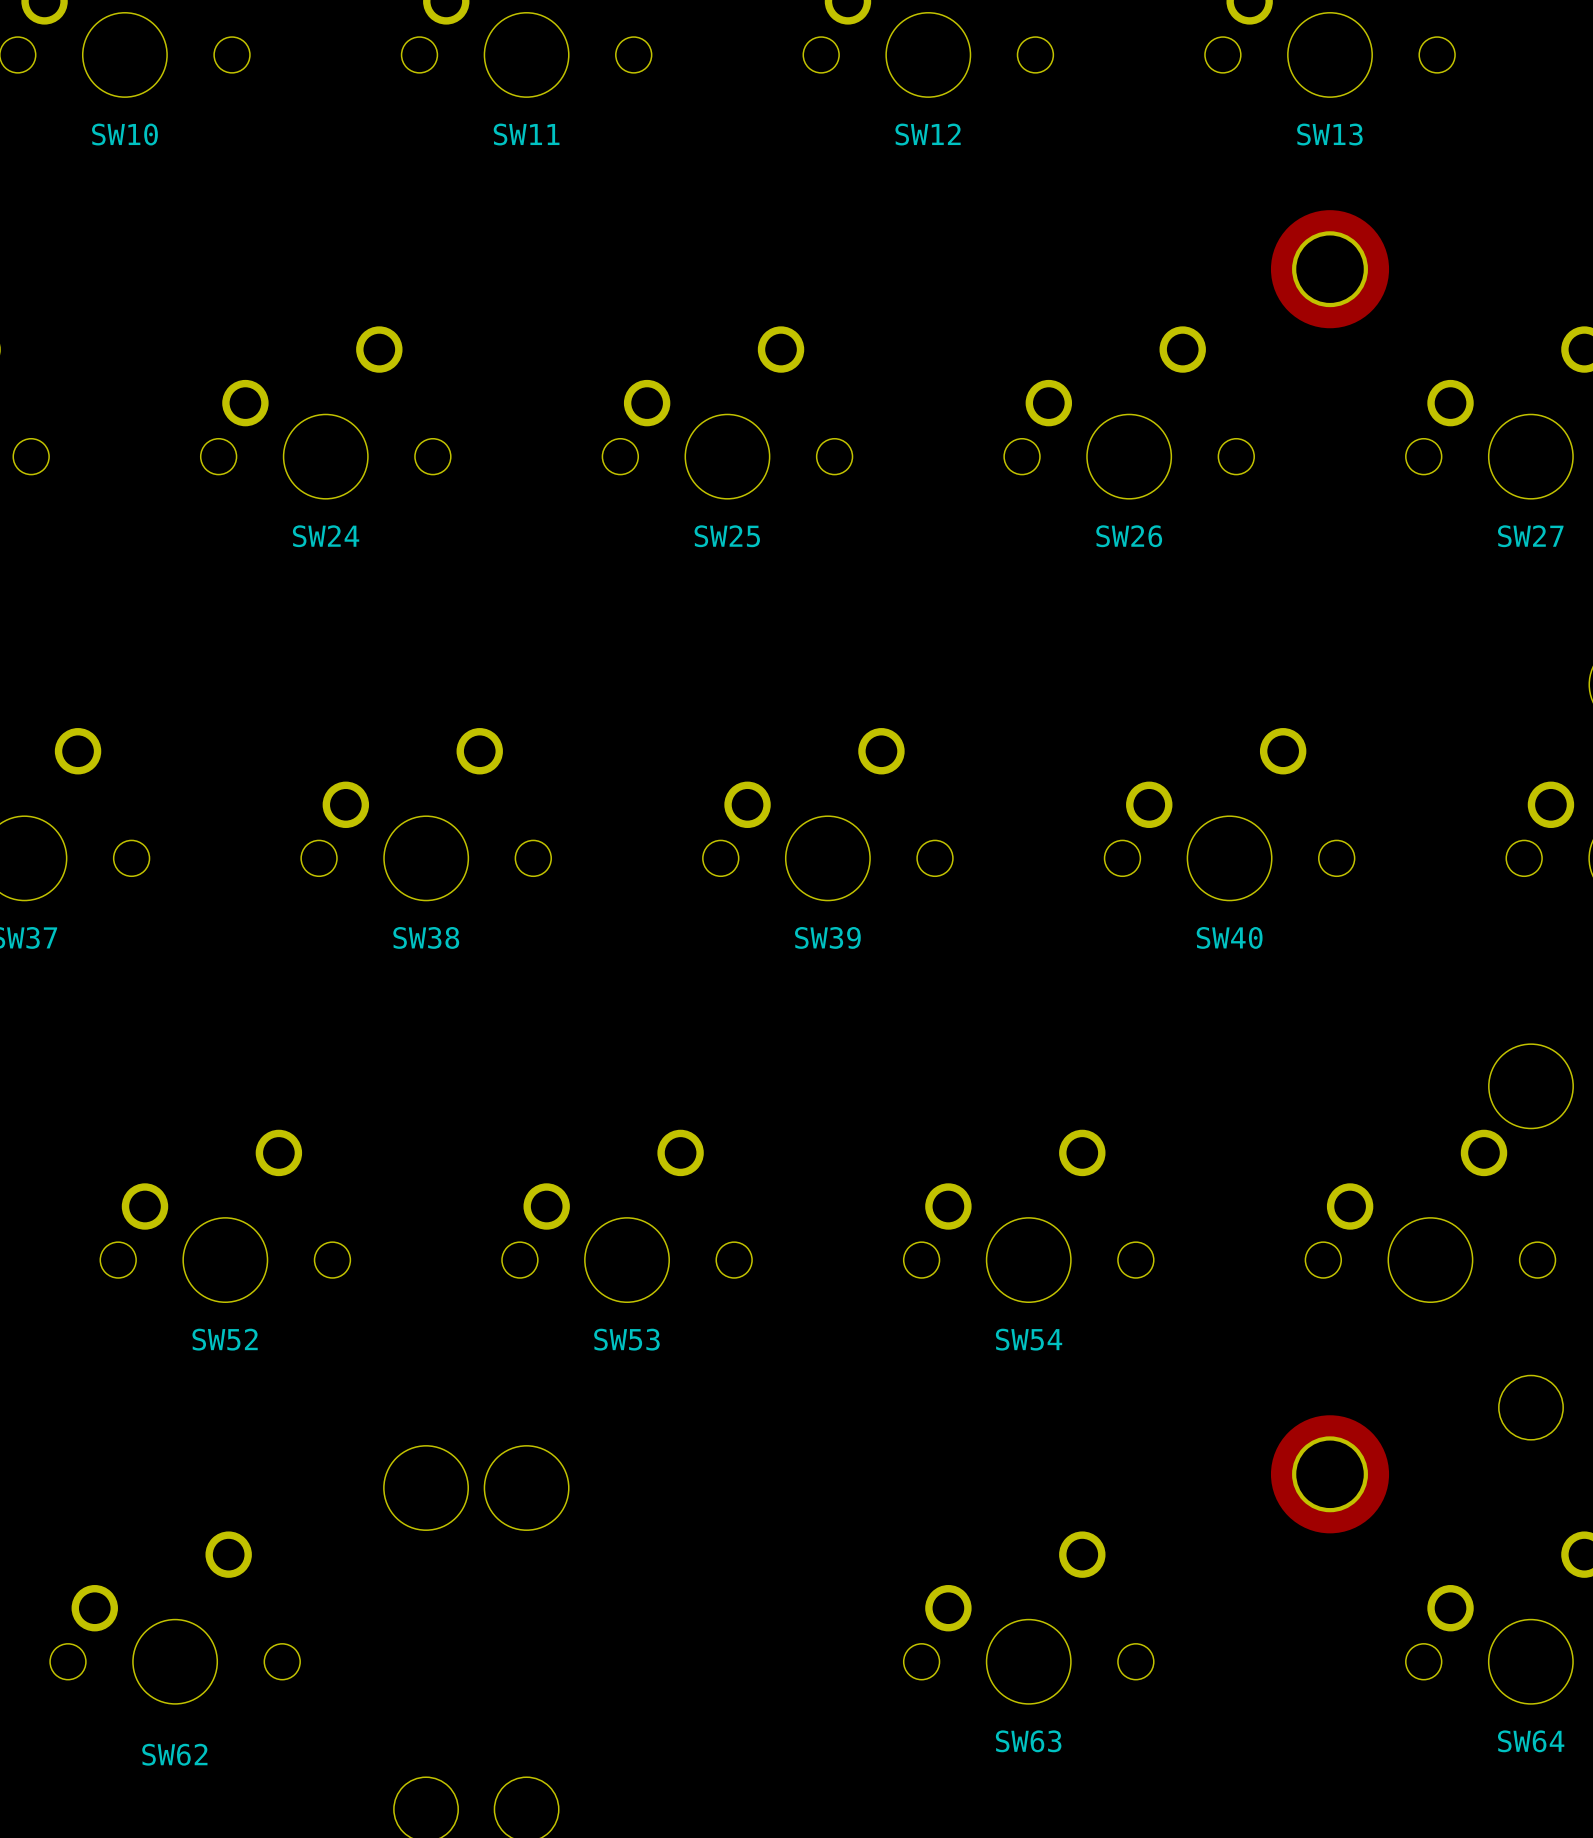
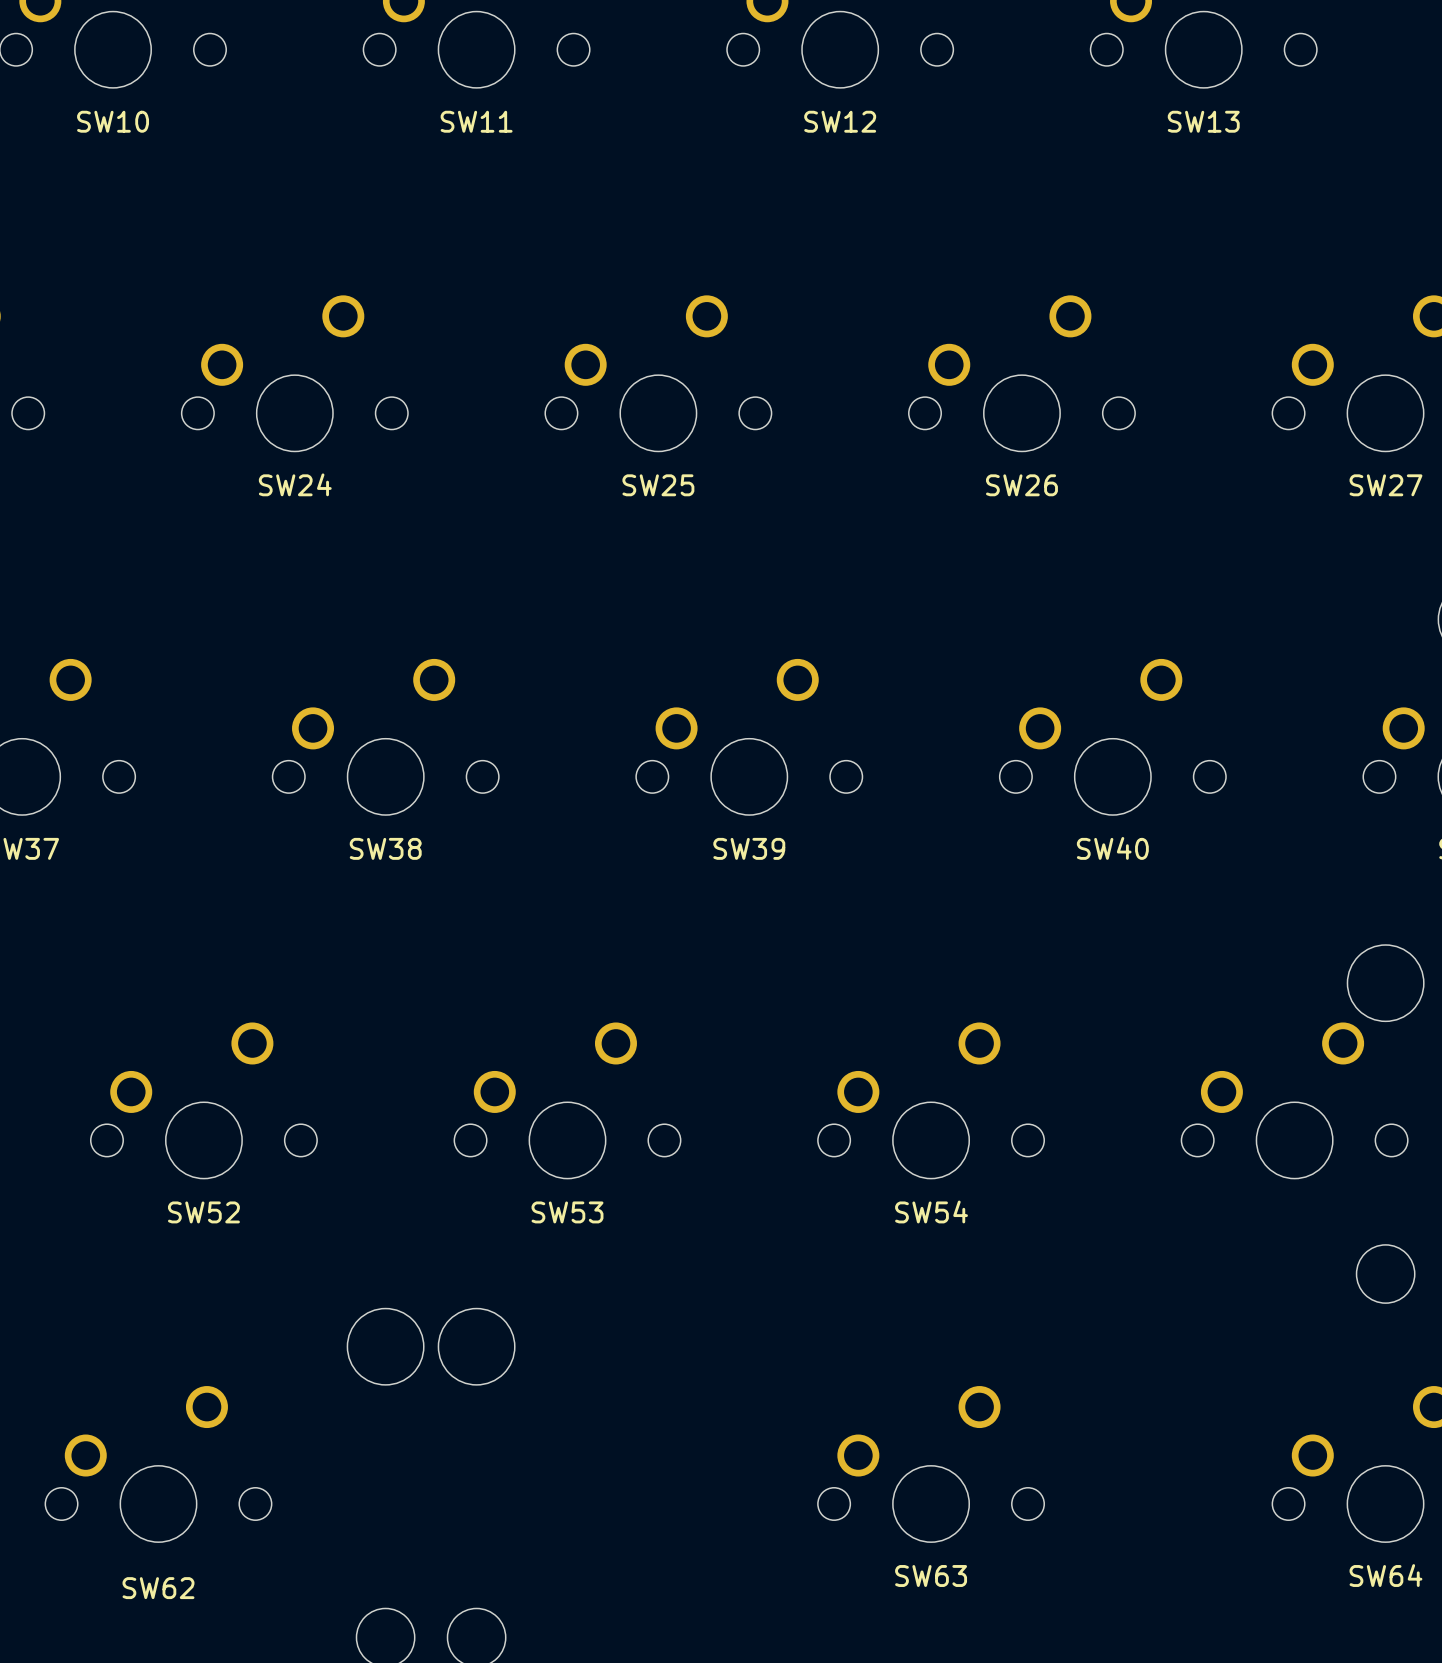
part: (1330, 269) -> none
part: (1330, 1474) -> none

